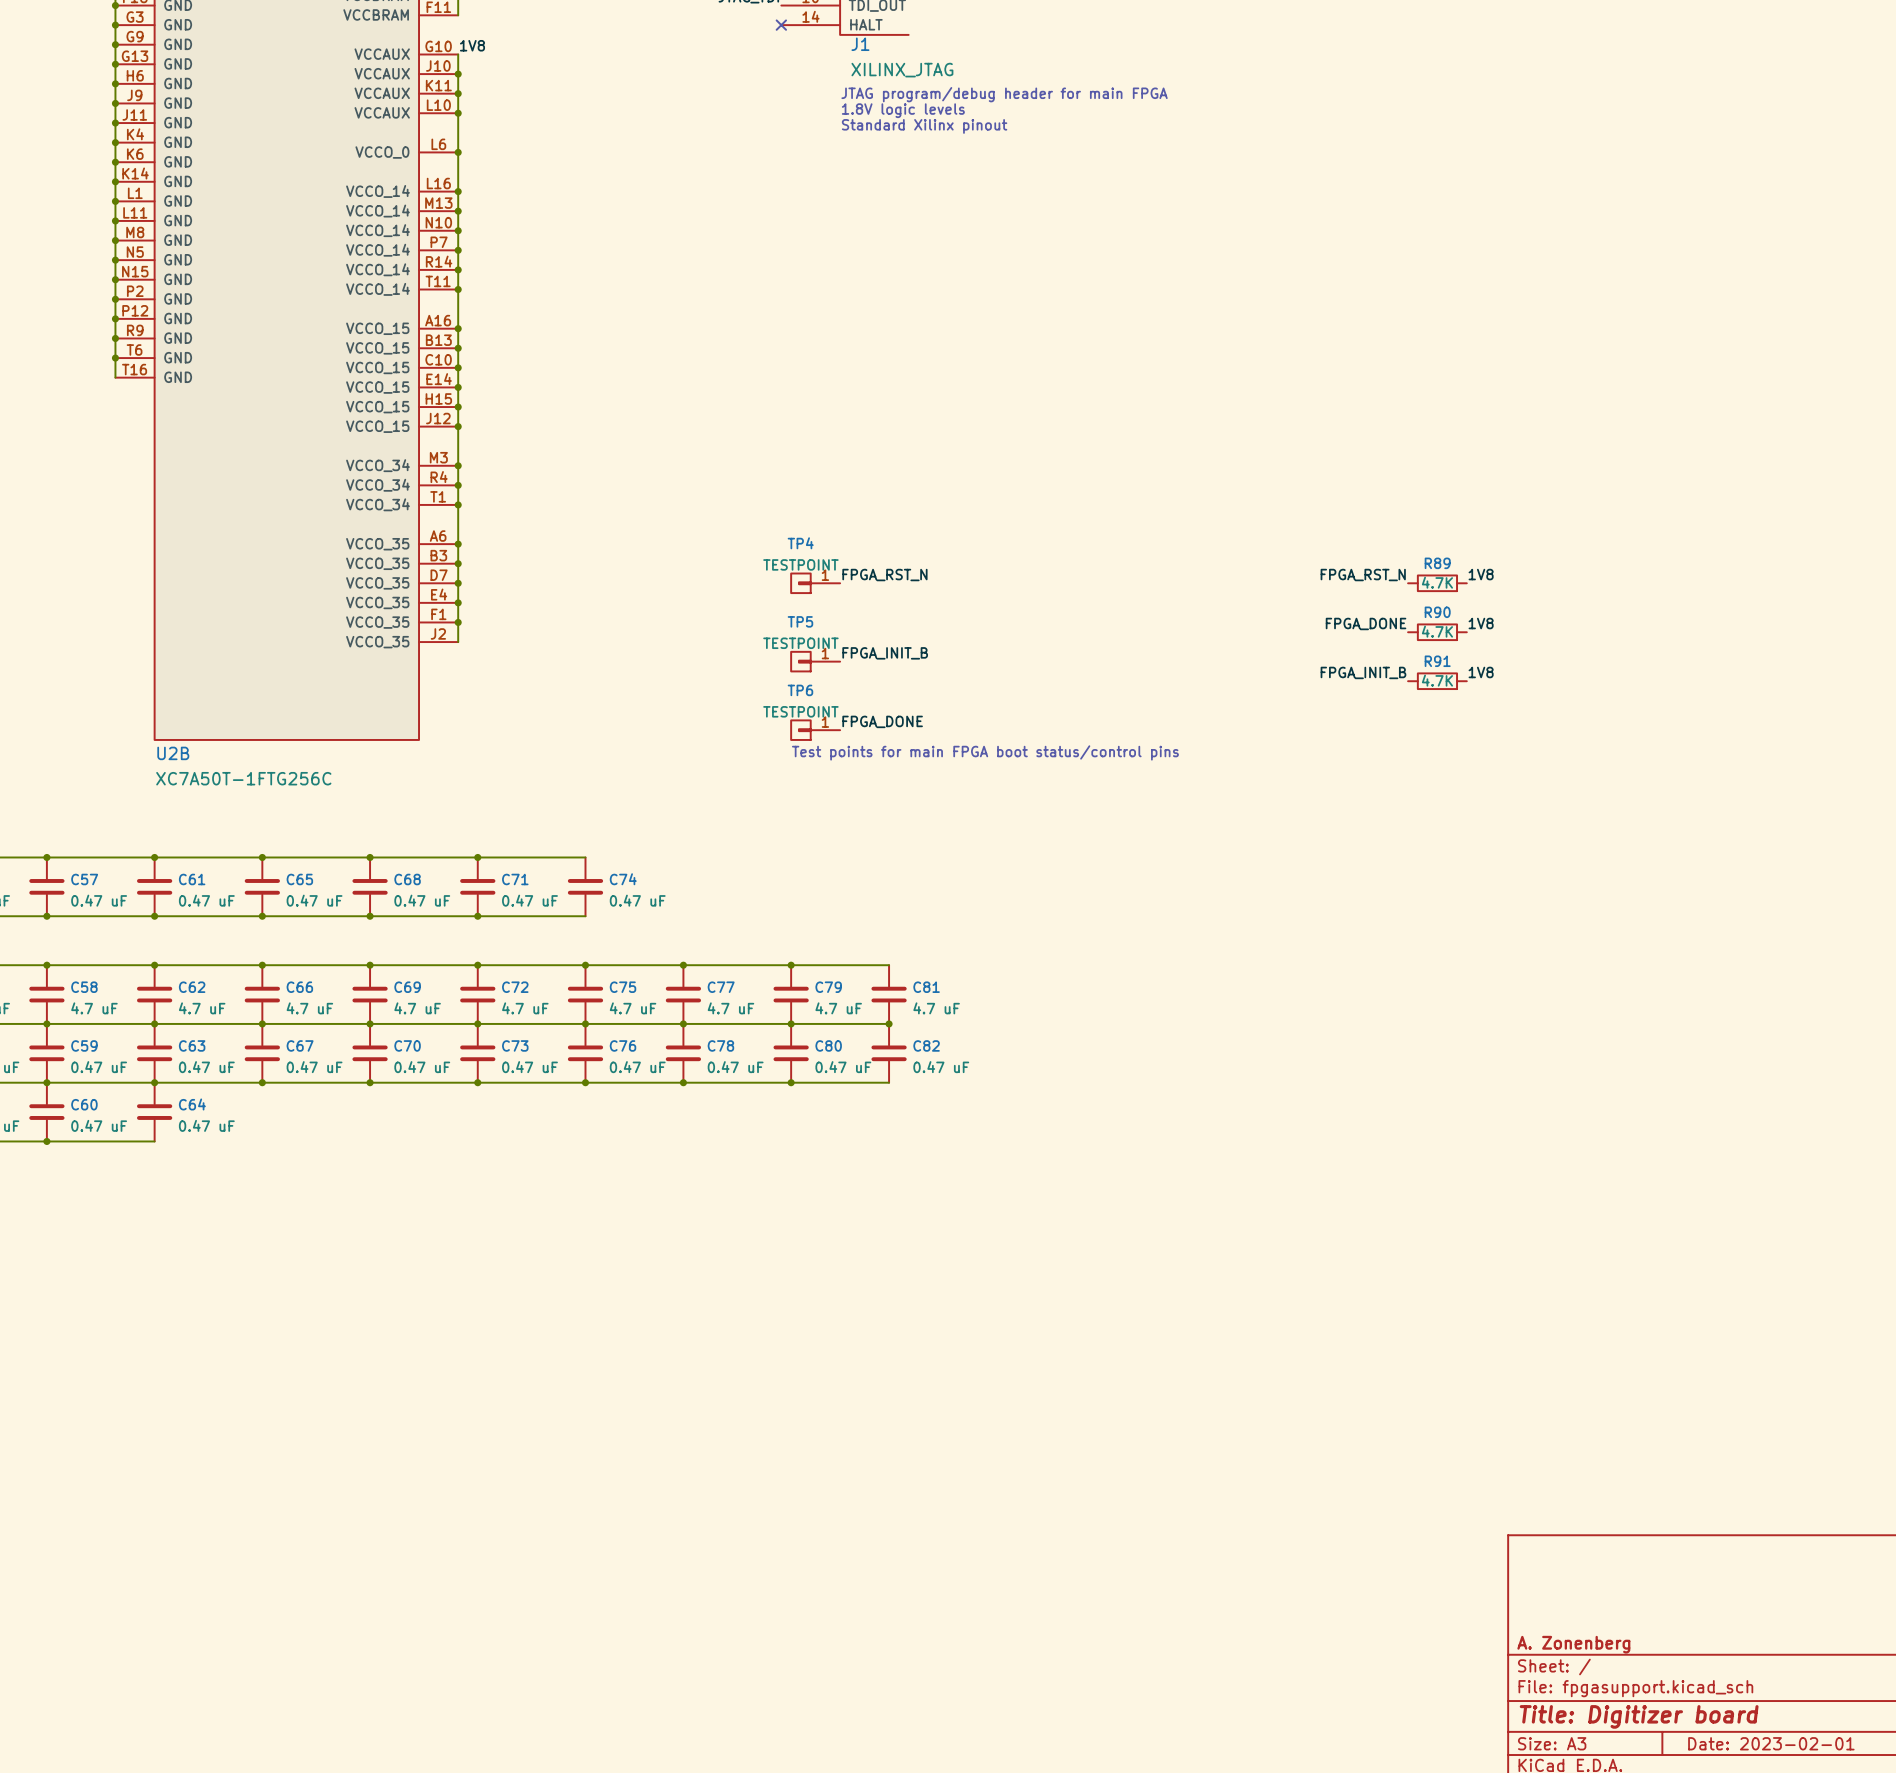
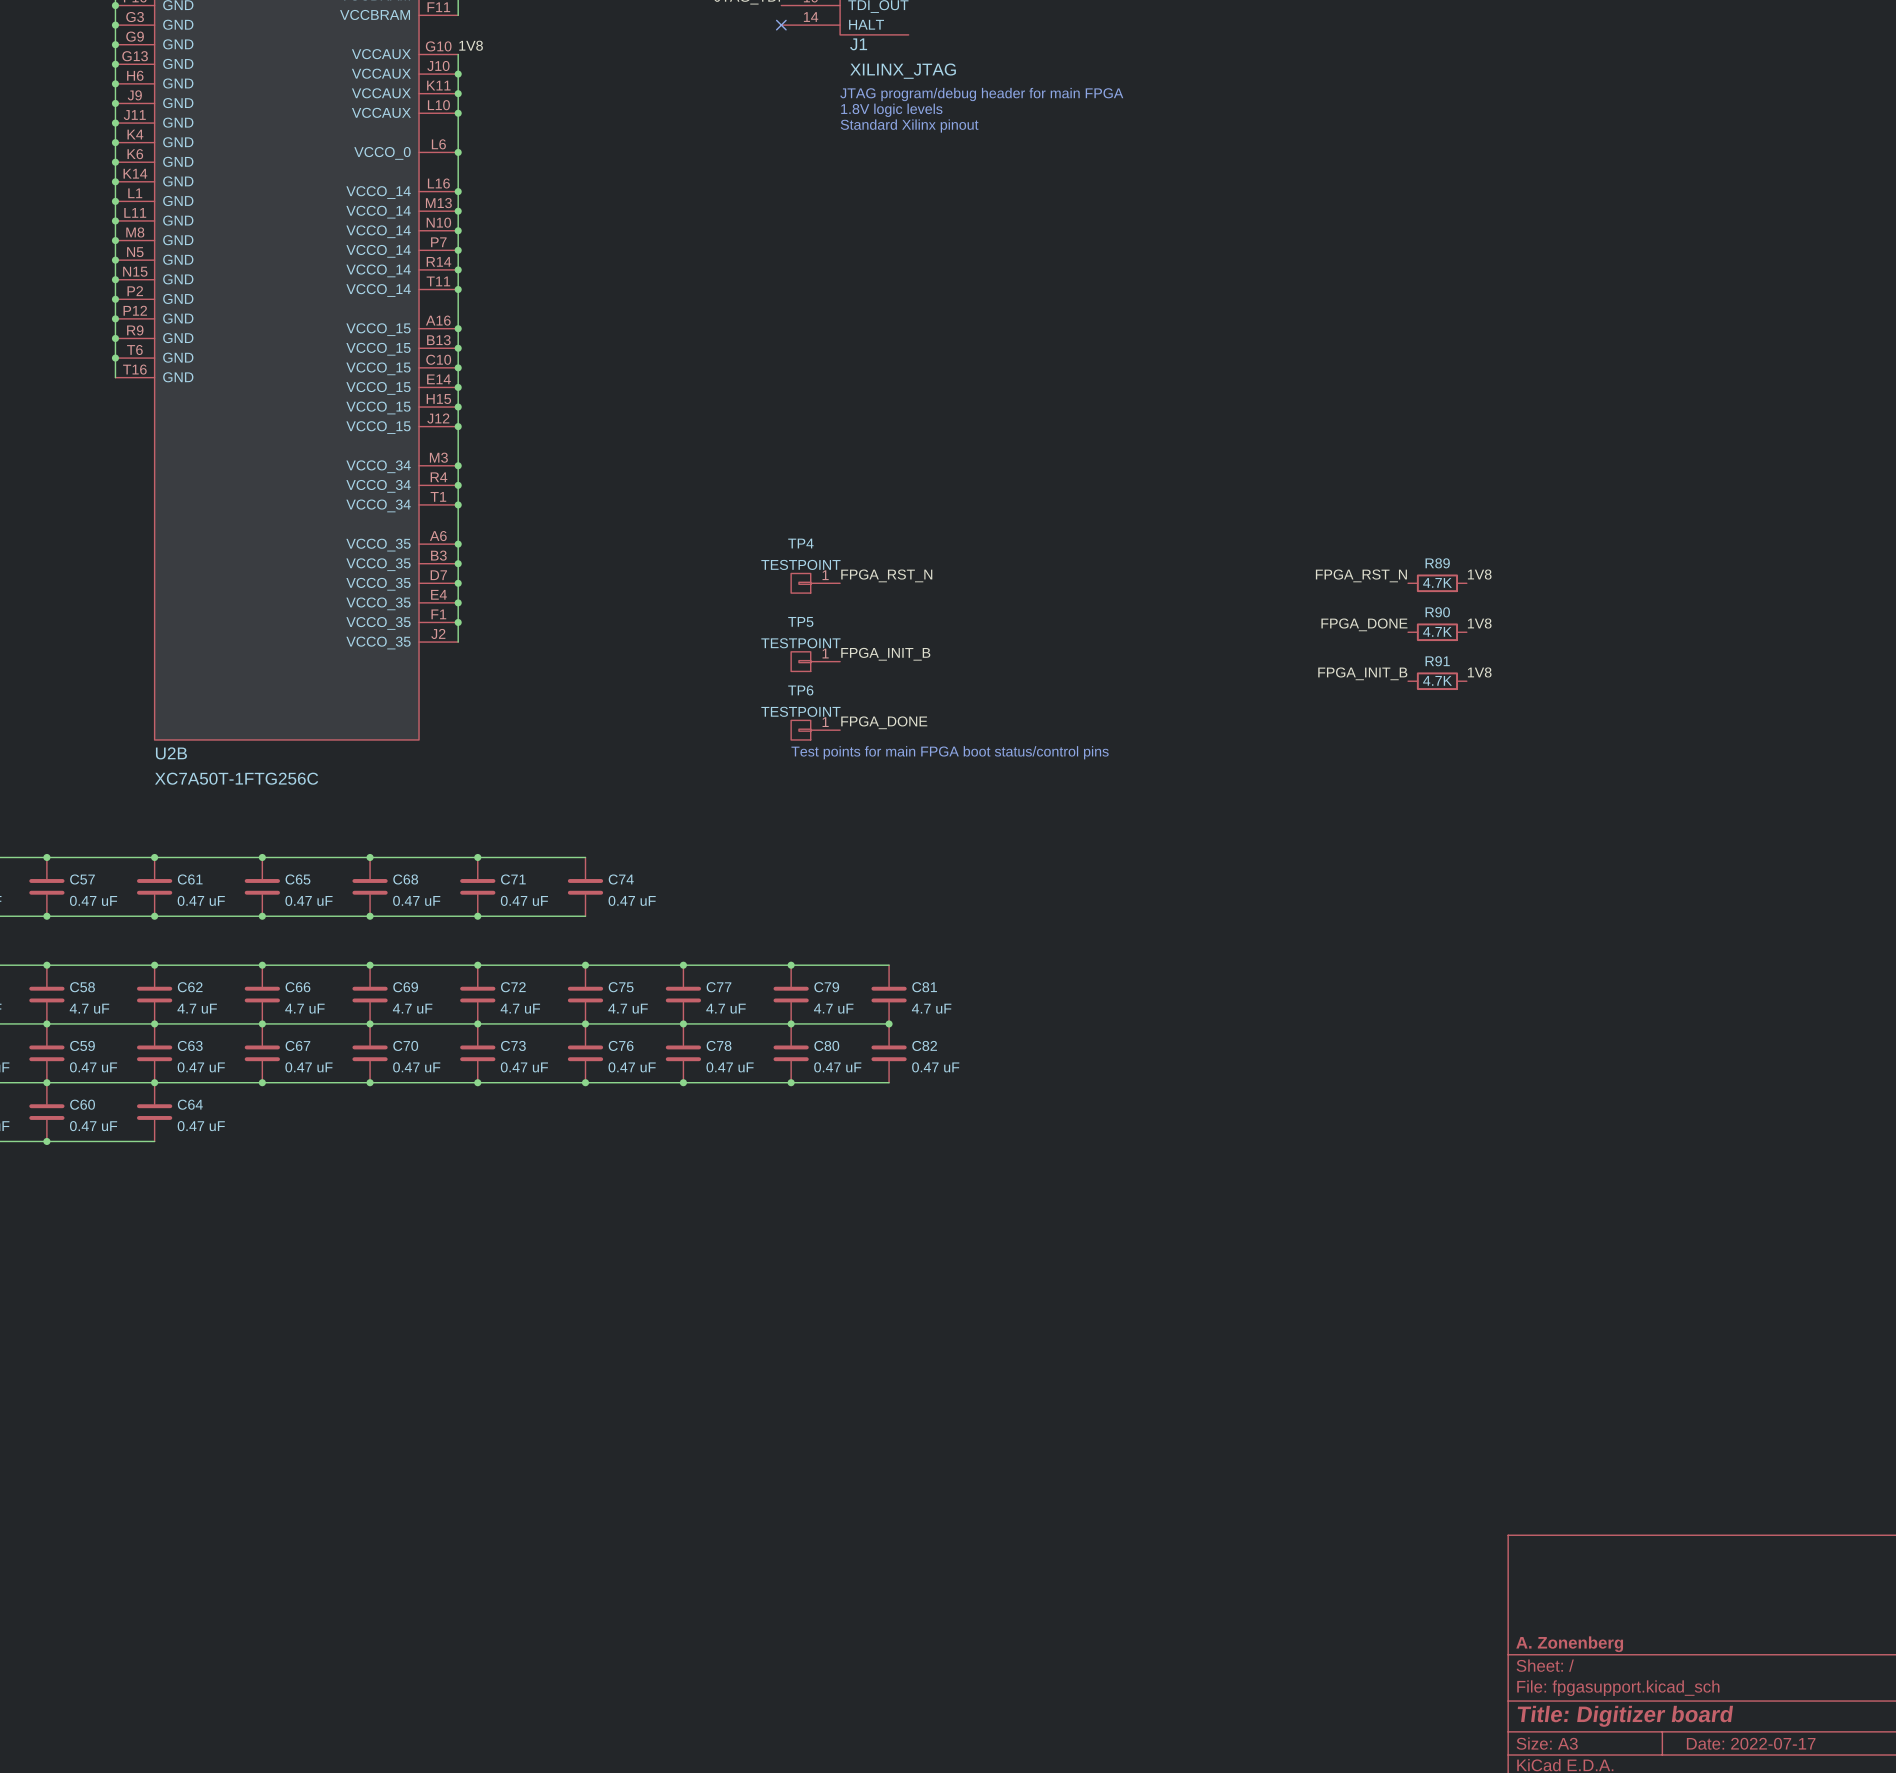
title block: Date: 2023-02-01 (1771, 1743) -> Date: 2022-07-17 (1751, 1743)

